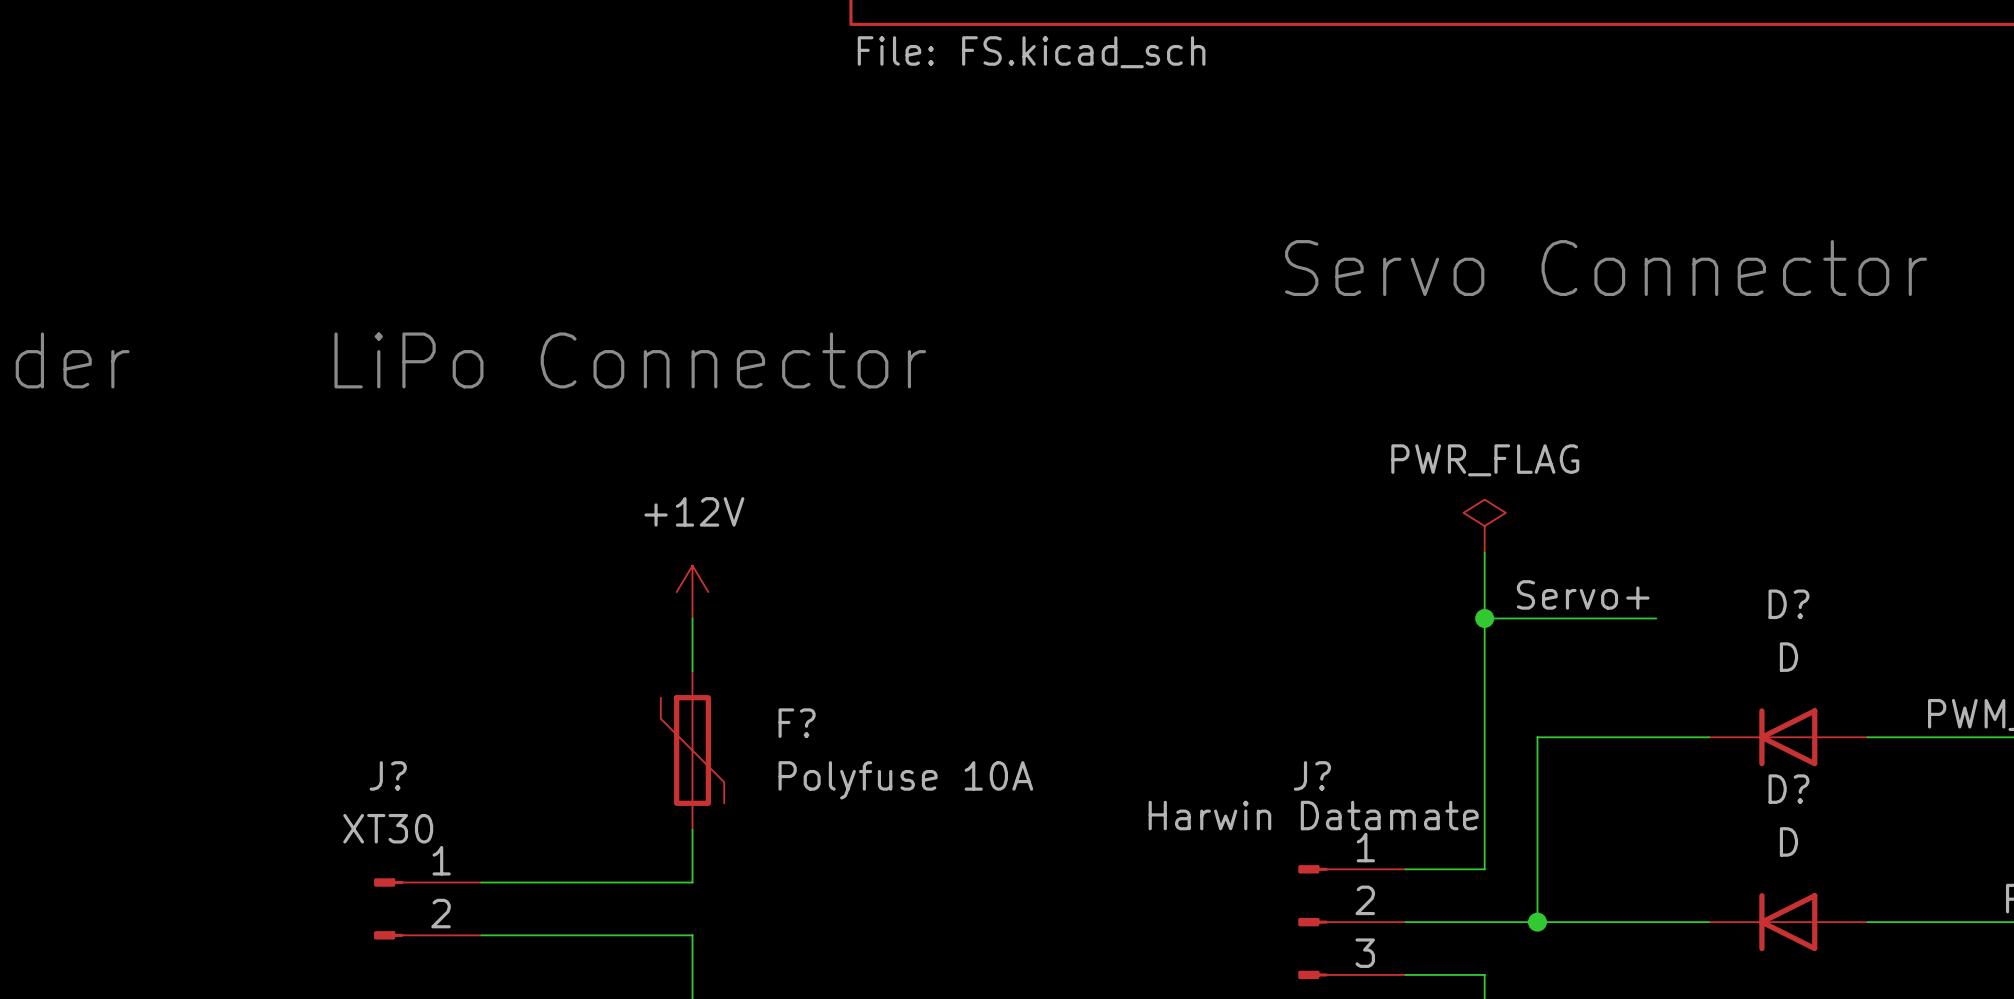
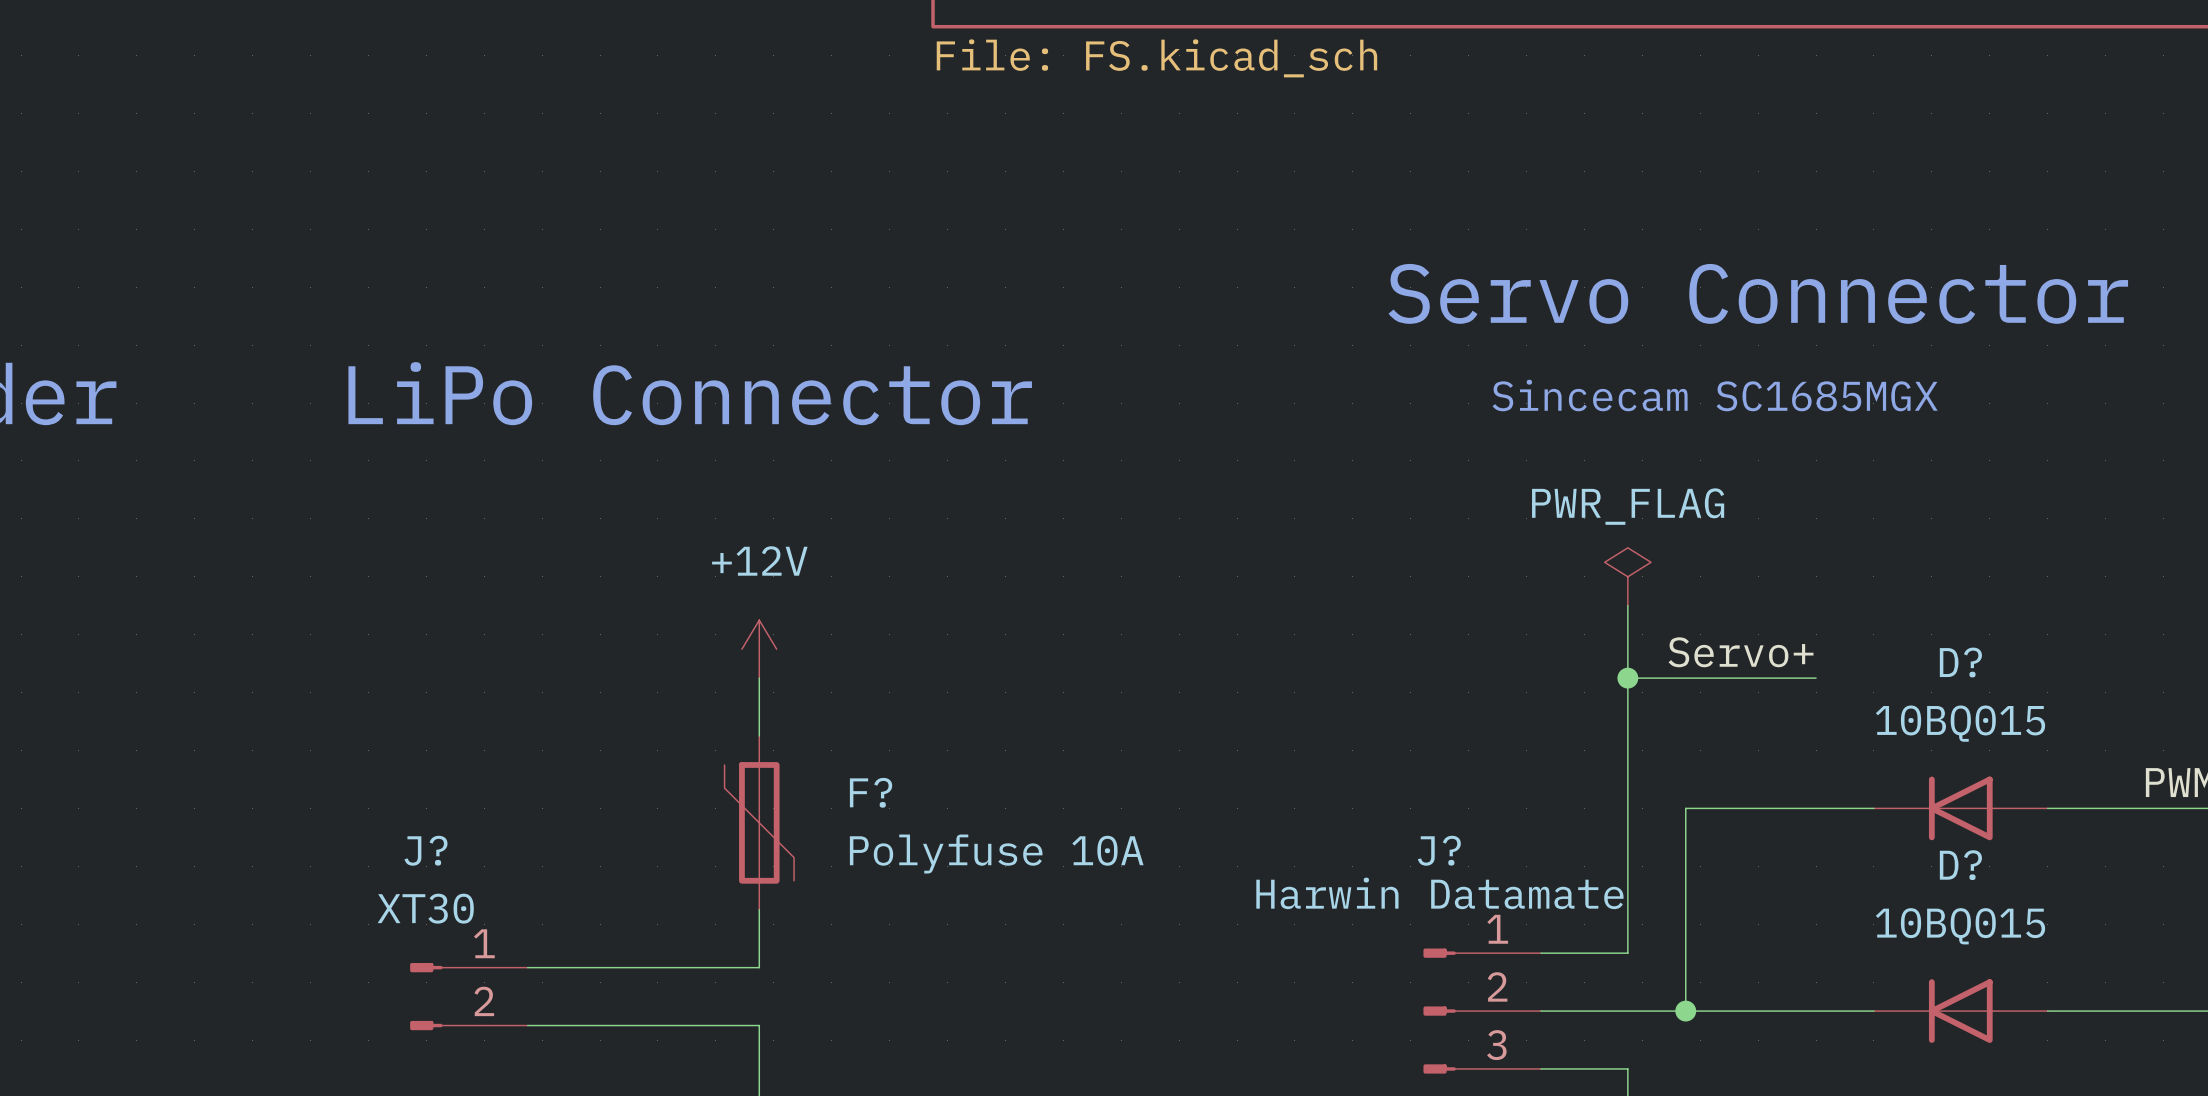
text: none -> Sincecam SC1685MGX (1715, 395)
D? value: D (1788, 657) -> 10BQ015 (1960, 723)
D? value: D (1788, 841) -> 10BQ015 (1960, 926)

